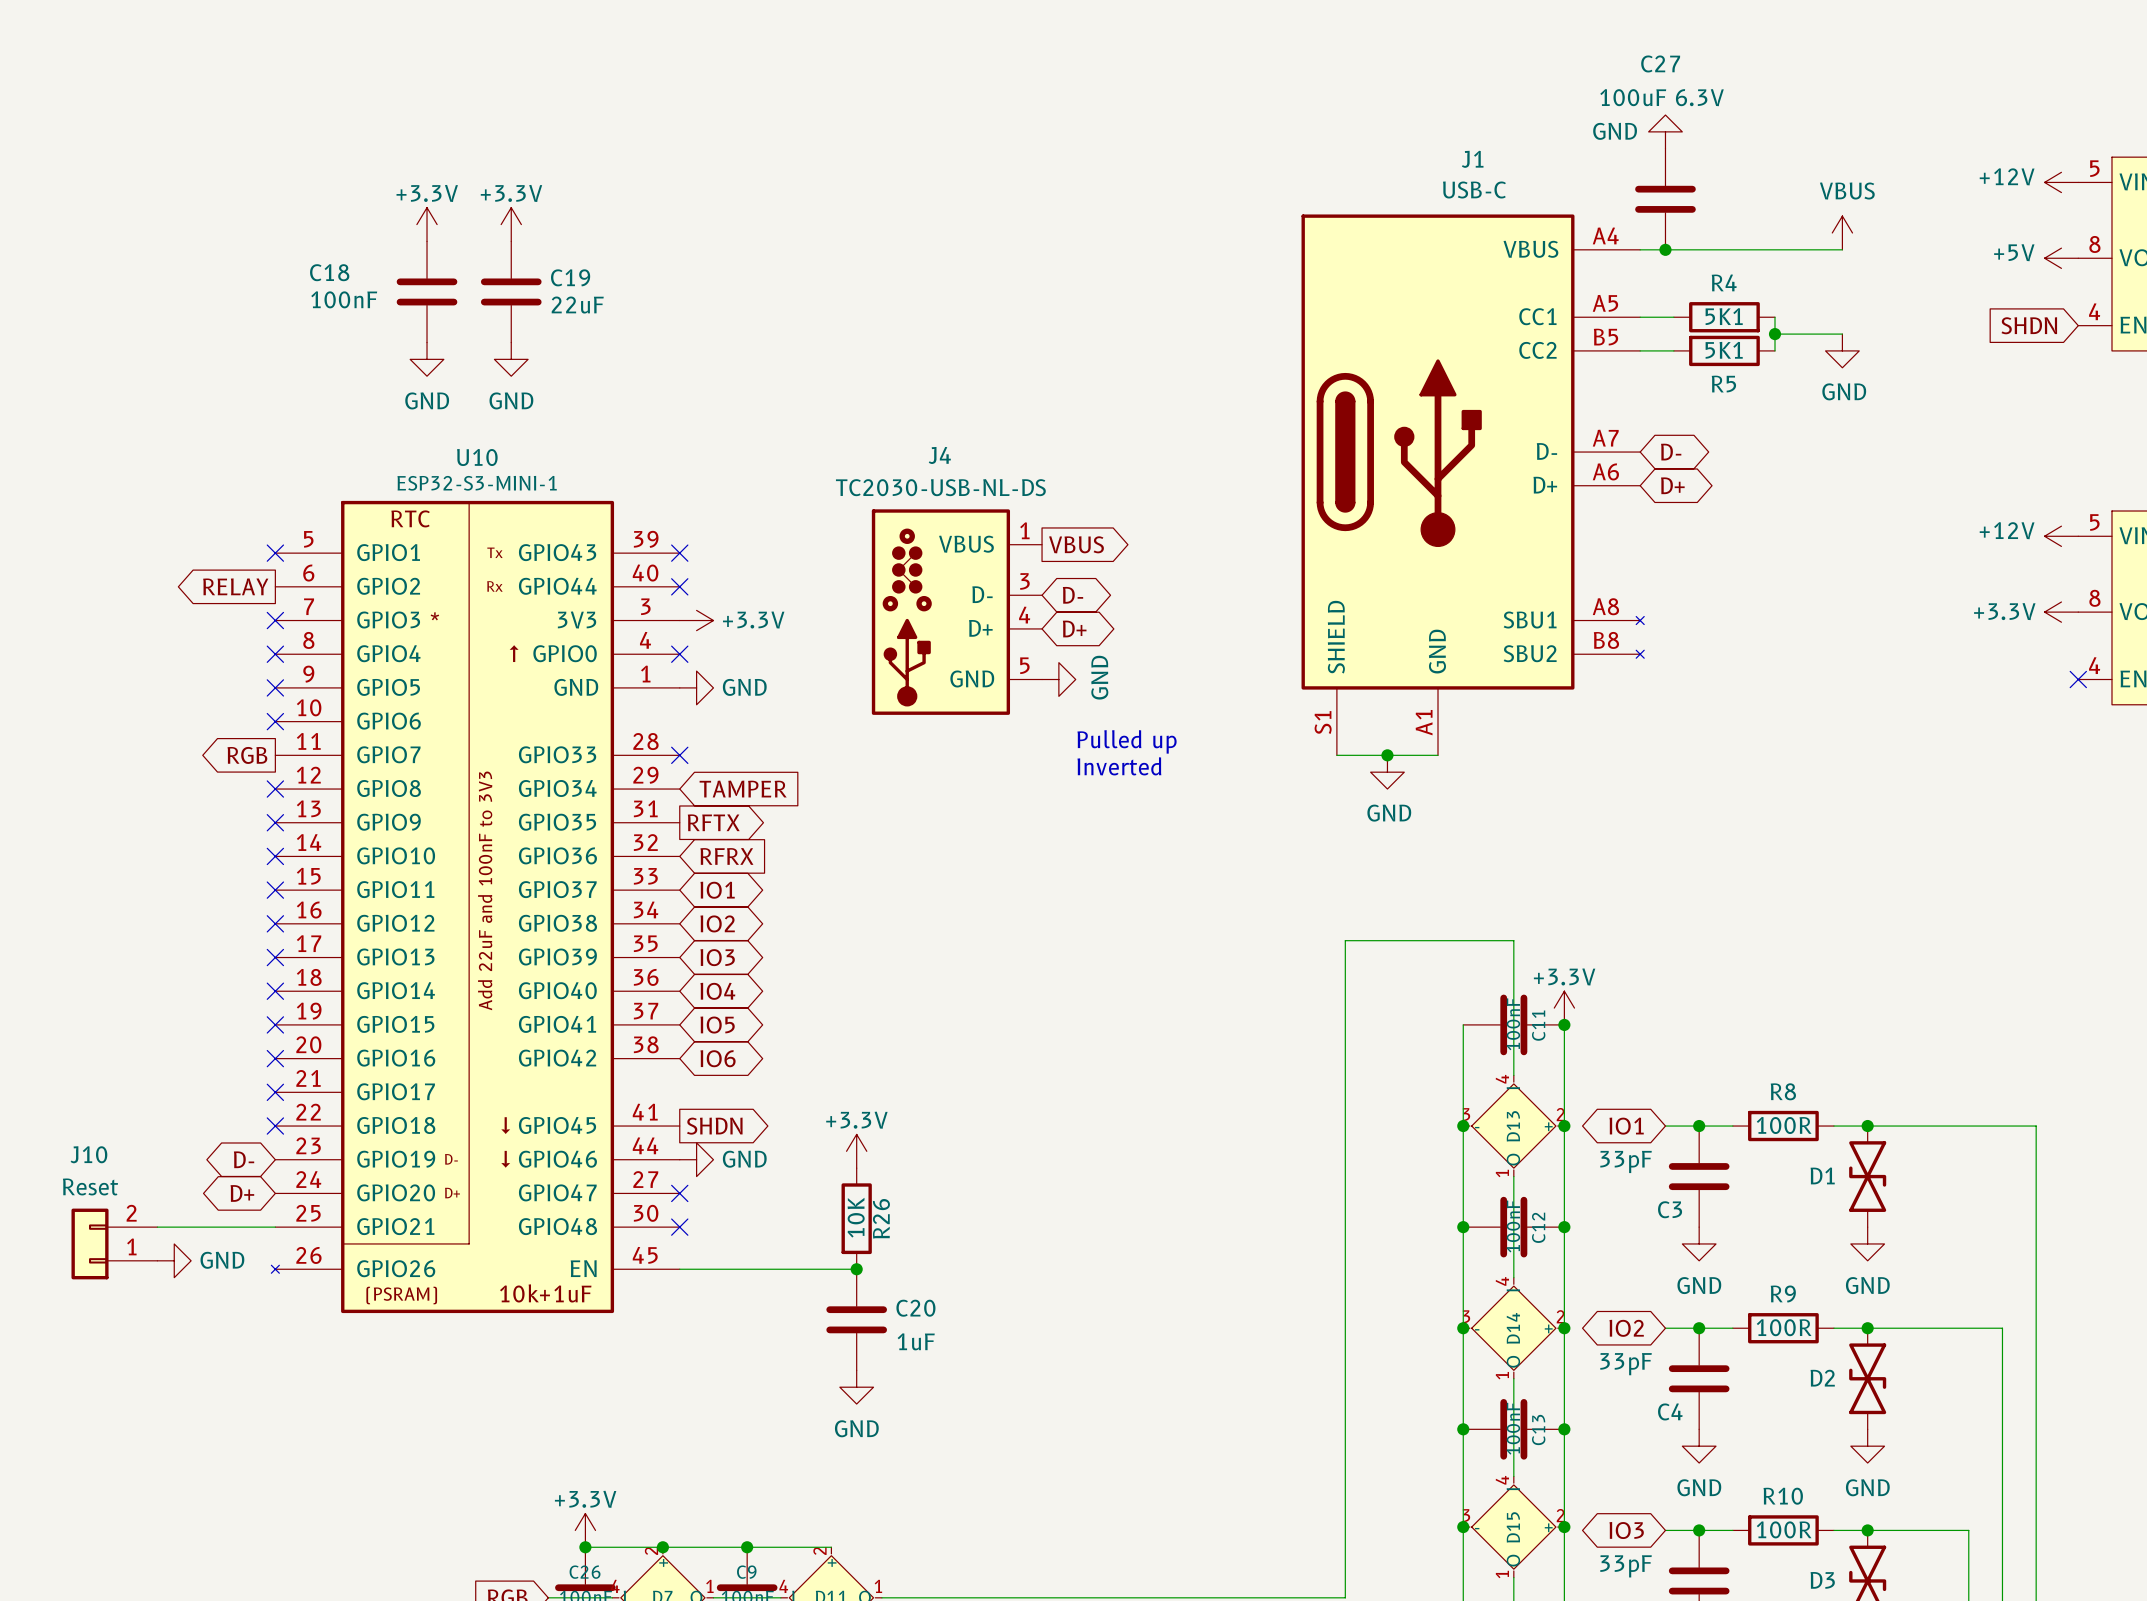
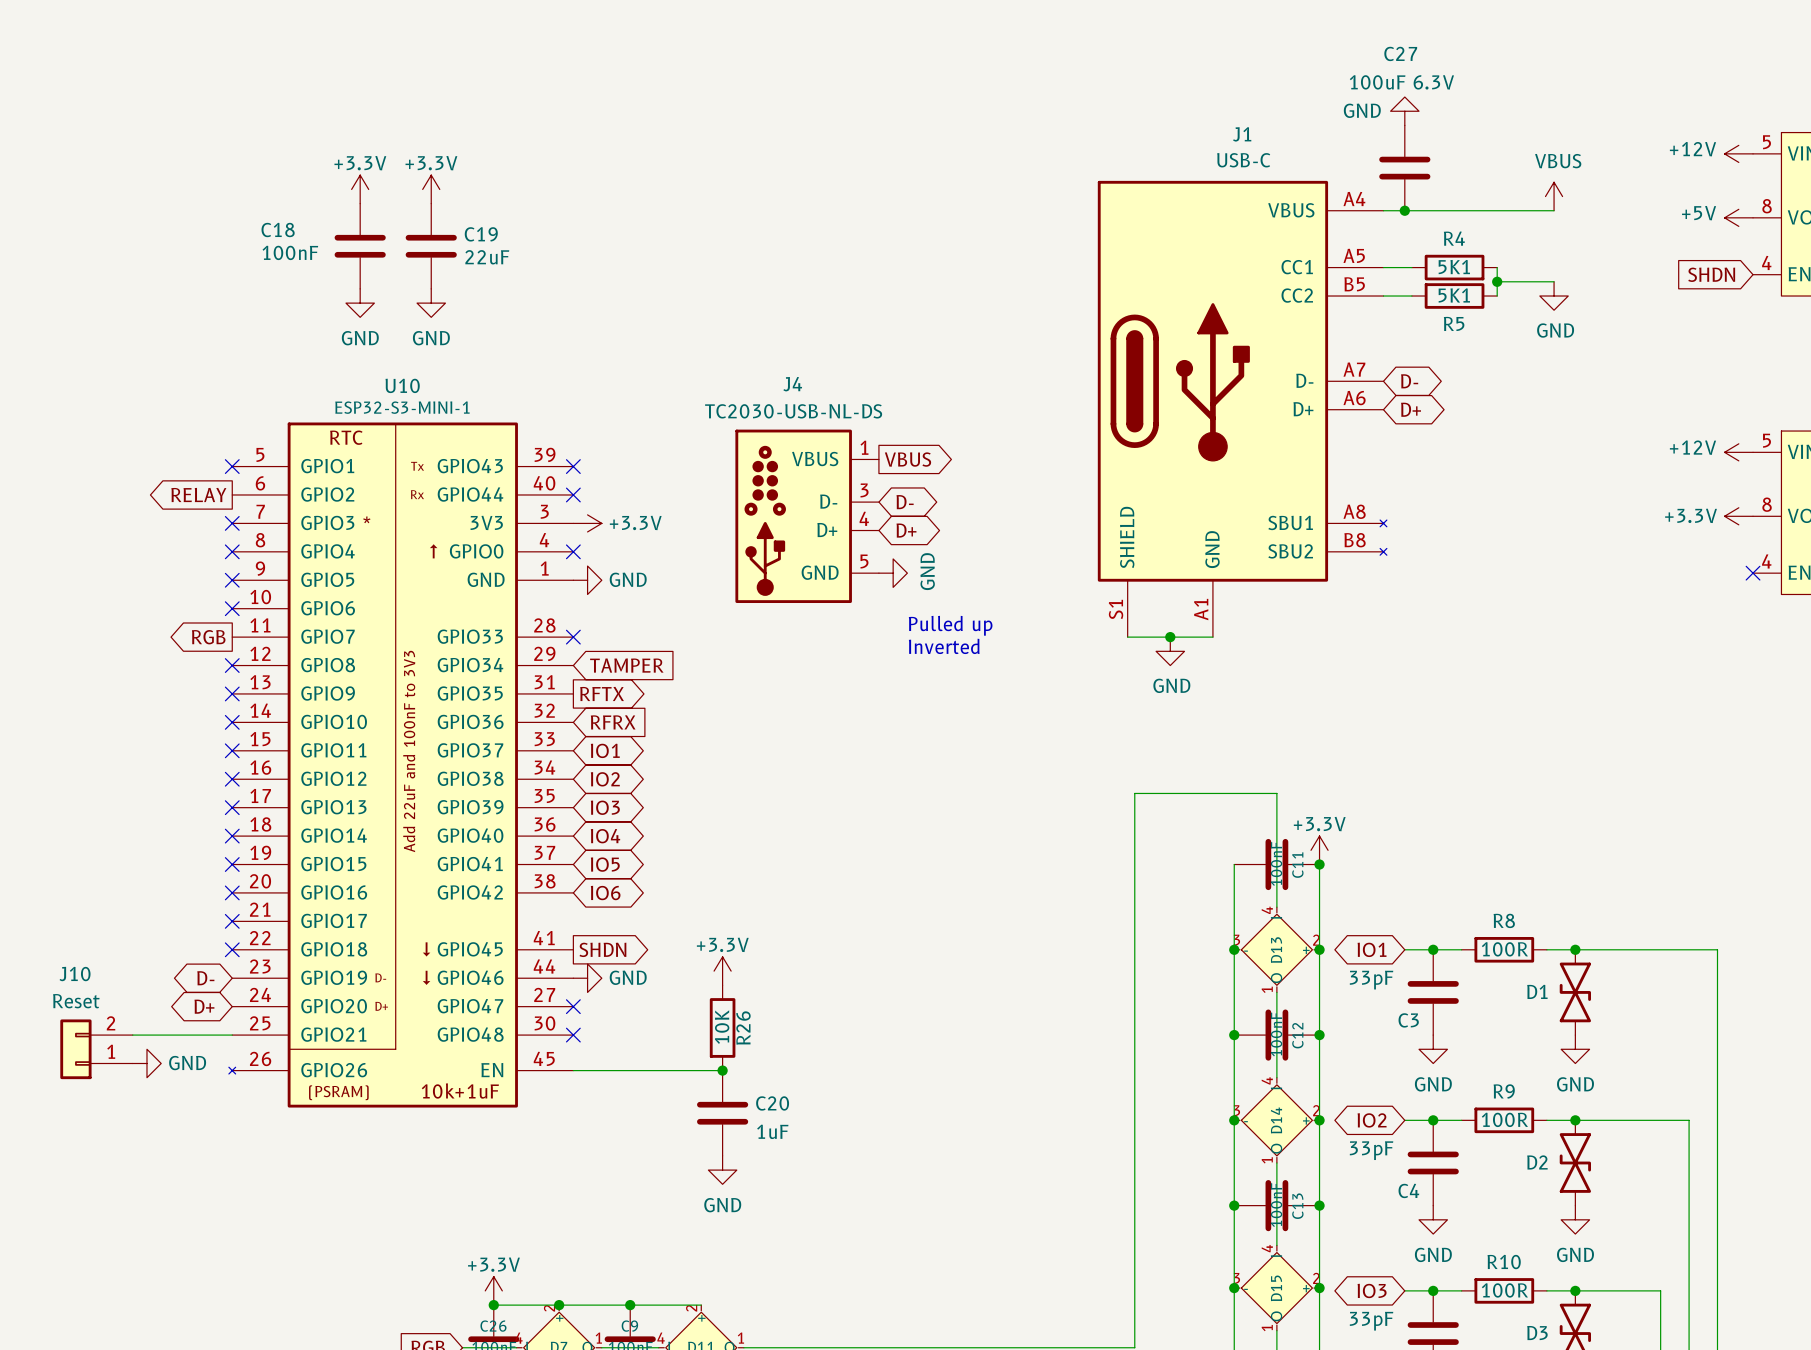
J4 symbol: [871, 509, 1043, 715] -> [735, 429, 879, 604]

